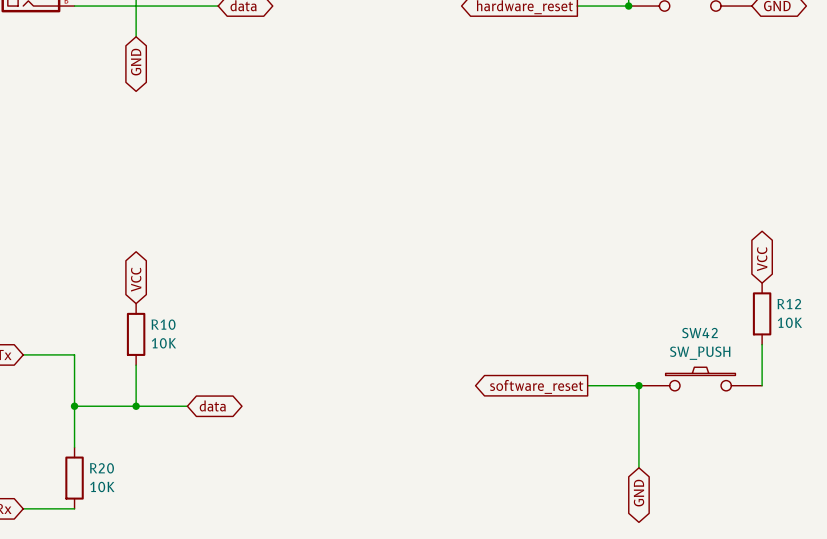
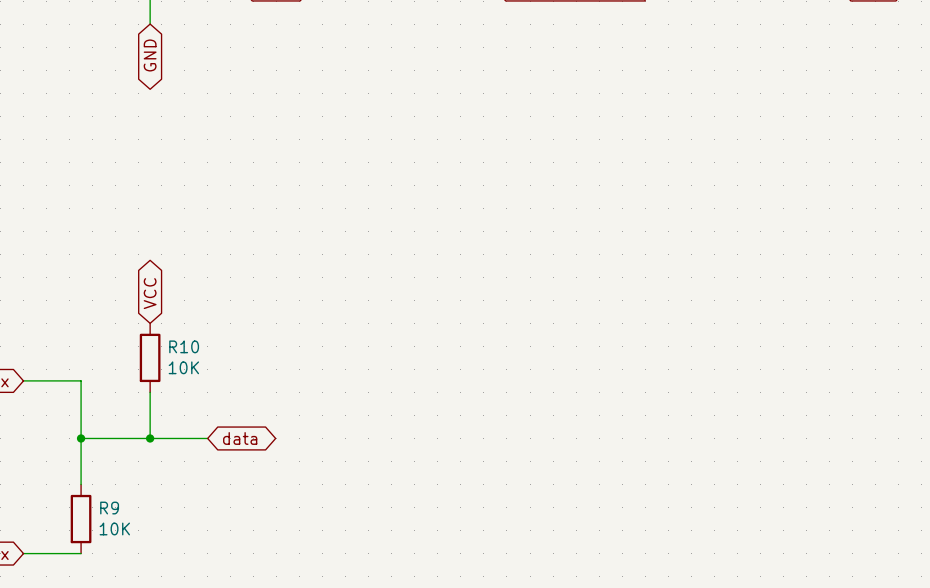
global label: VCC (762, 259) -> none
R12: 10K (762, 313) -> none
wire: (762, 344) (762, 385) -> none
SW42: SW_PUSH (700, 379) -> none
wire: (587, 385) (638, 385) (638, 467) -> none
junction: (638, 385) -> none
global label: software_reset (536, 386) -> none
R20 name: R20 (101, 468) -> R9 (109, 508)
global label: GND (639, 493) -> none

